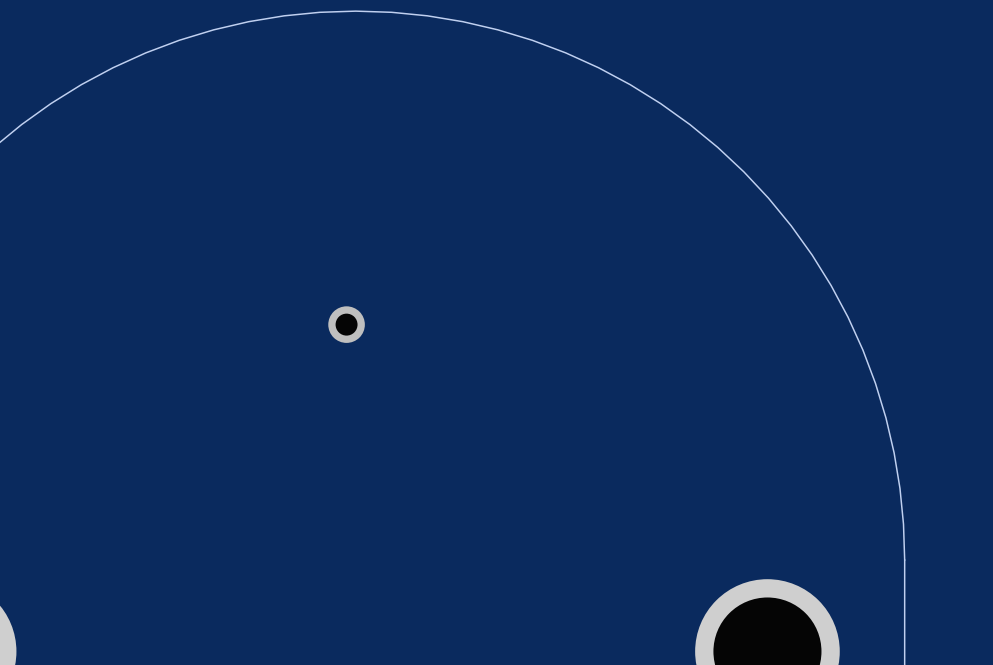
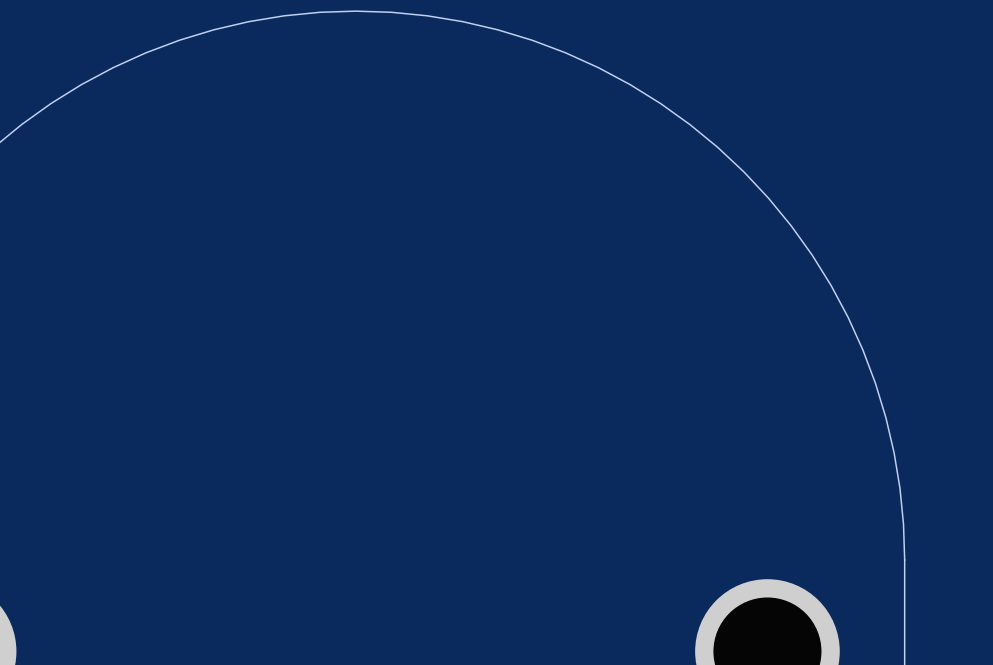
via: (346, 324) -> none

